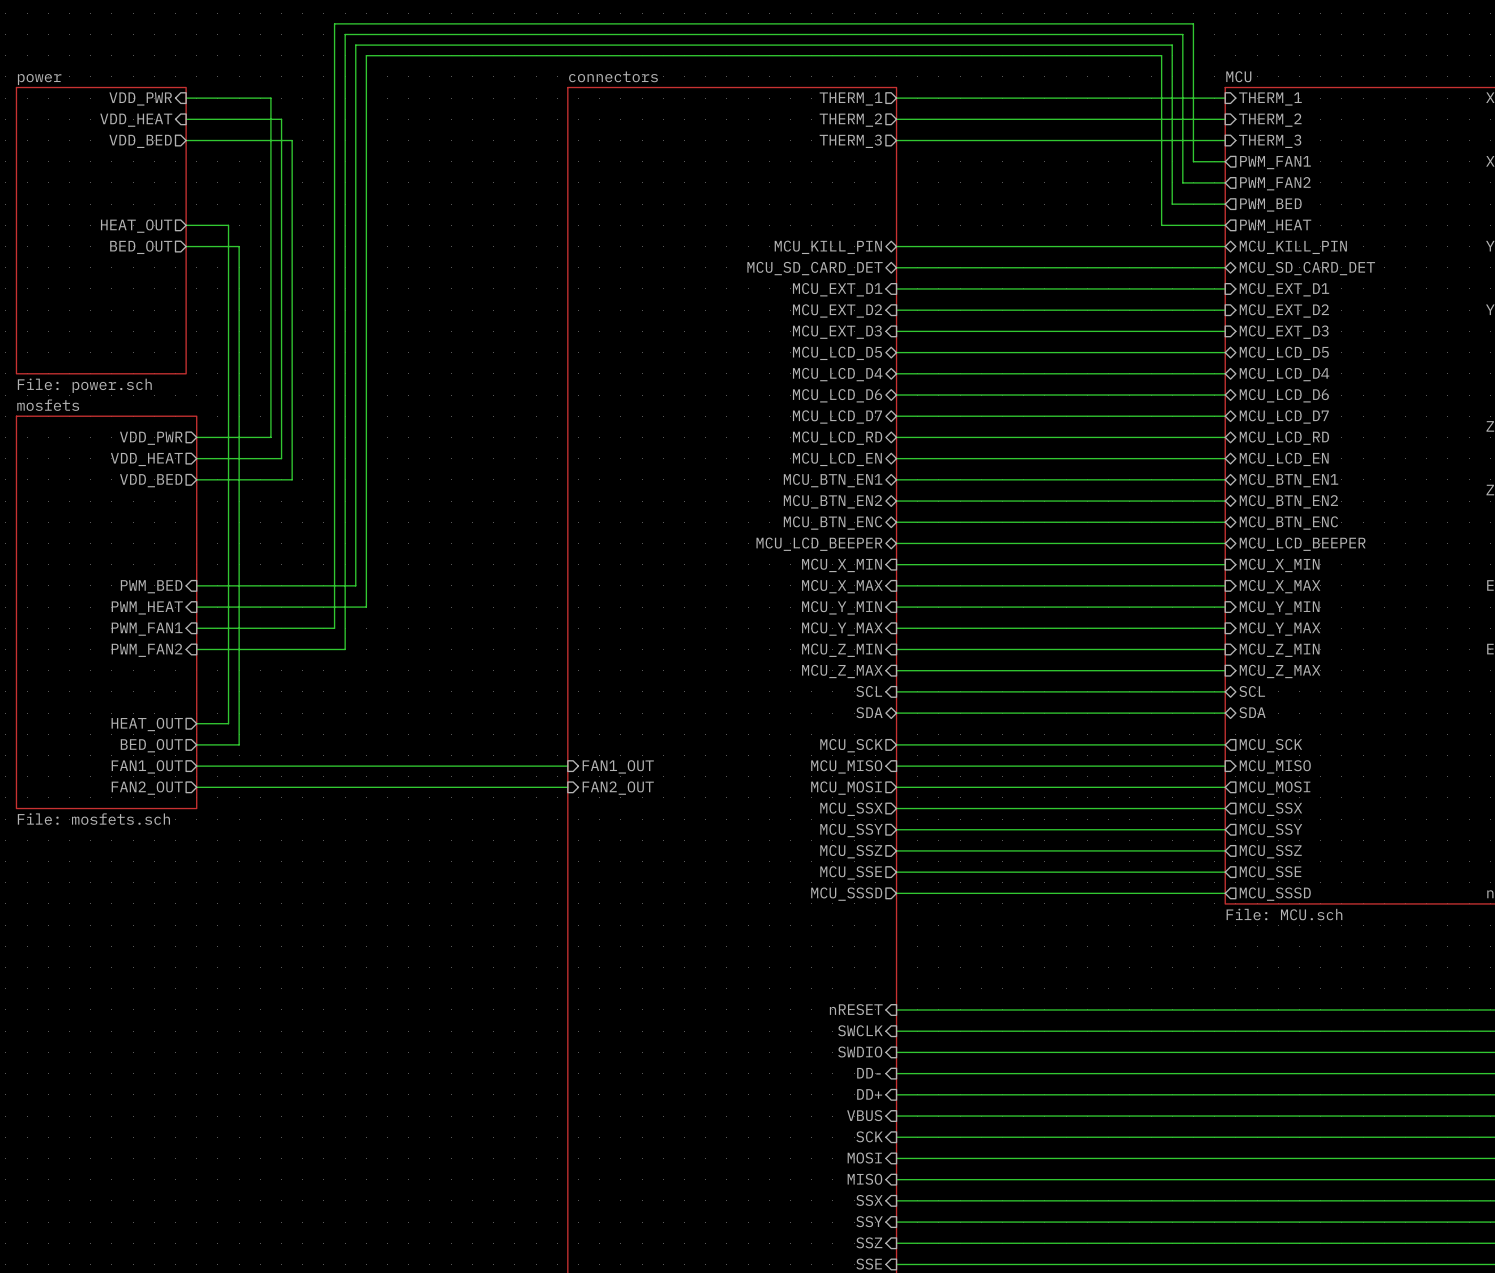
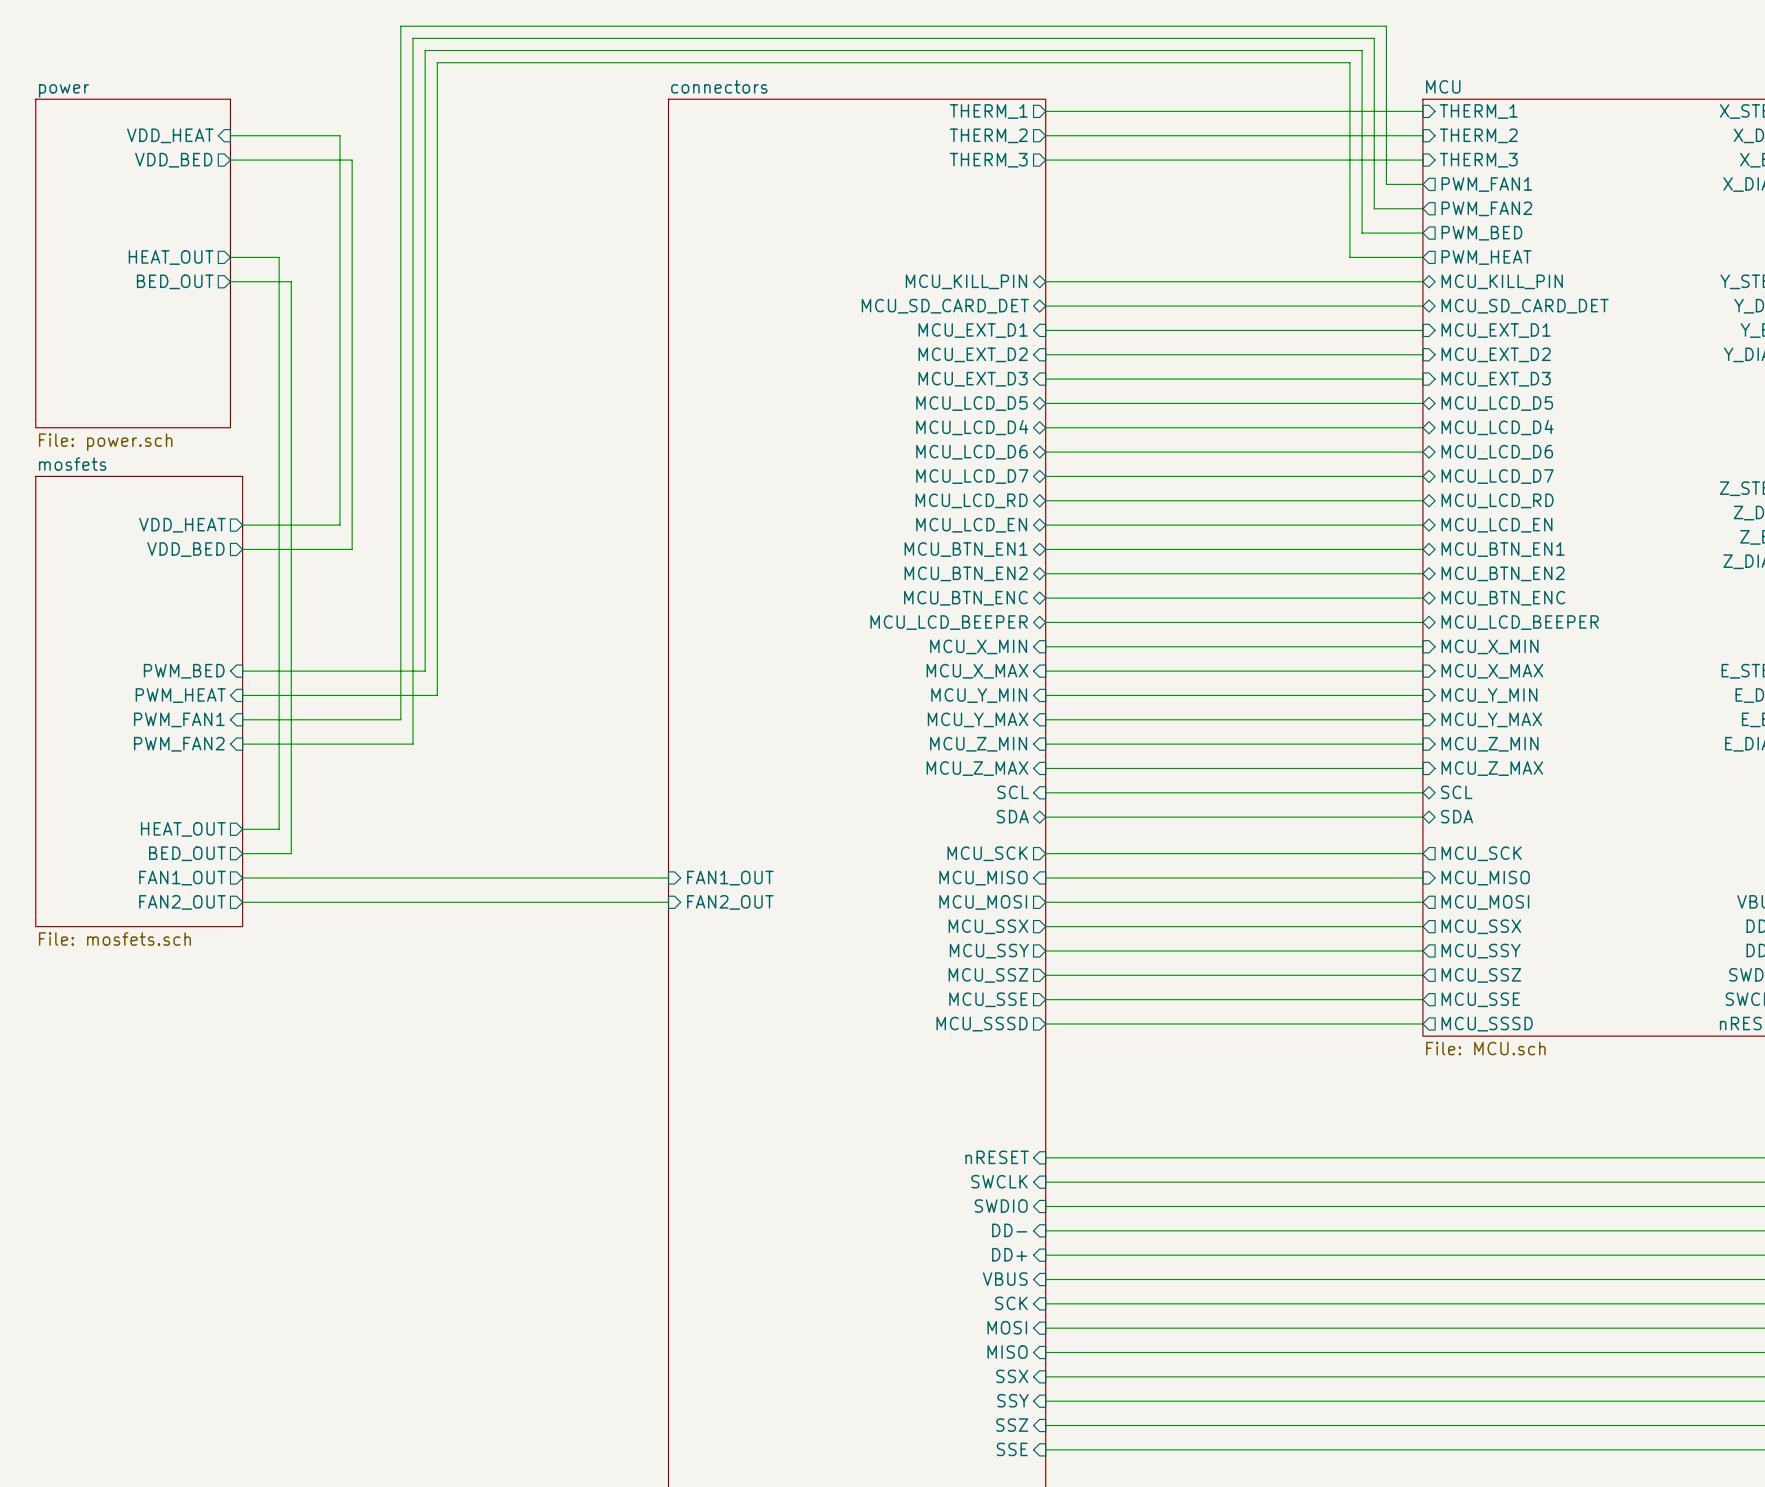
wire: (186, 98) (270, 98) (270, 437) (196, 437) -> none
sheet pin: VDD_PWR (140, 99) -> none
sheet pin: VDD_PWR (151, 438) -> none

